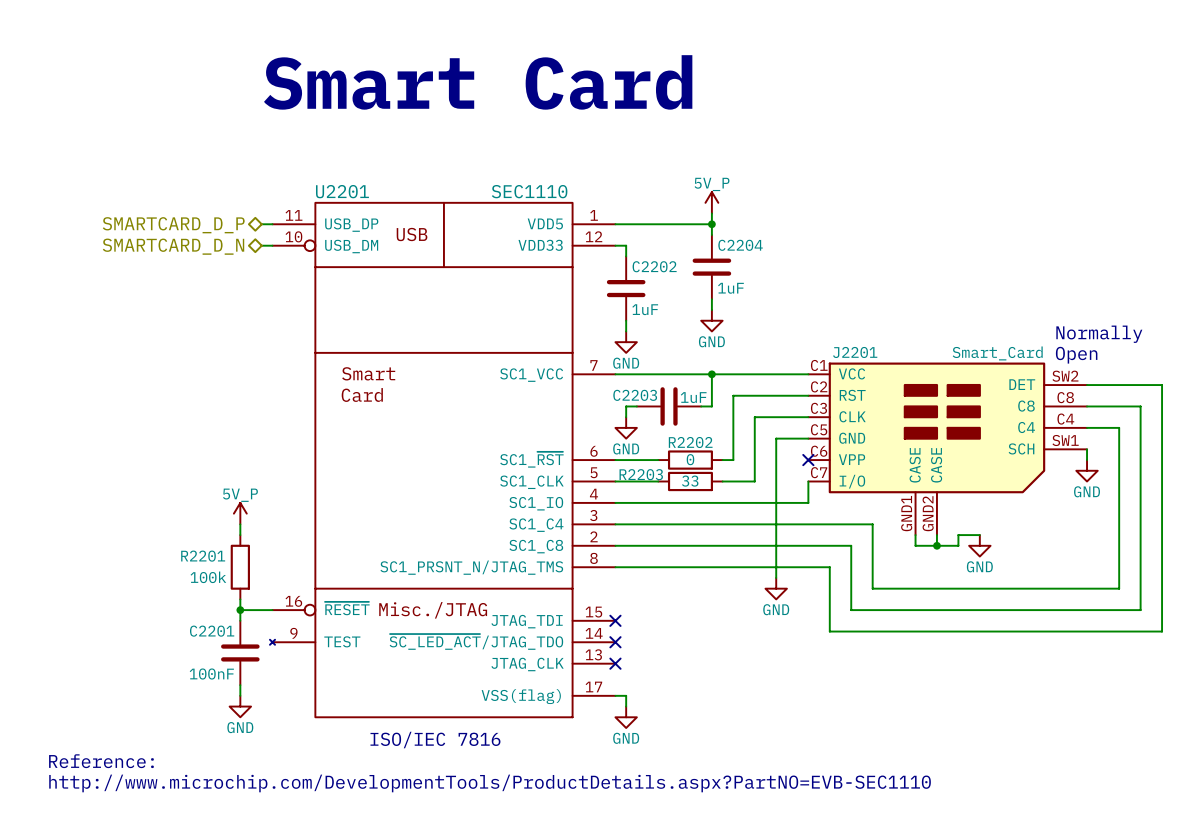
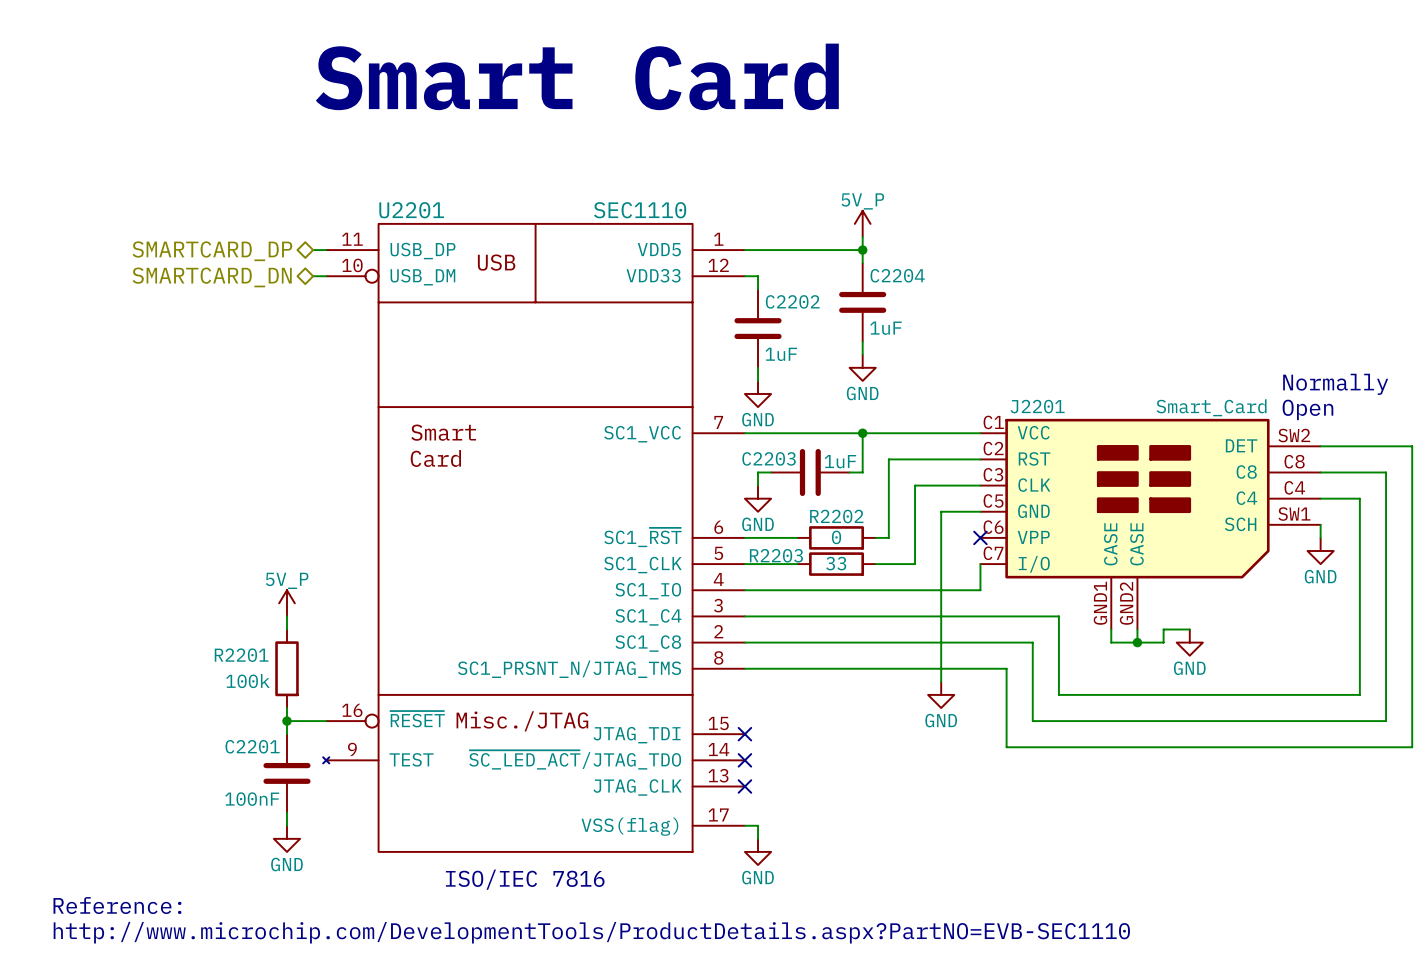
hierarchical label: SMARTCARD_D_P (173, 225) -> SMARTCARD_DP (212, 251)
hierarchical label: SMARTCARD_D_N (173, 246) -> SMARTCARD_DN (212, 277)

